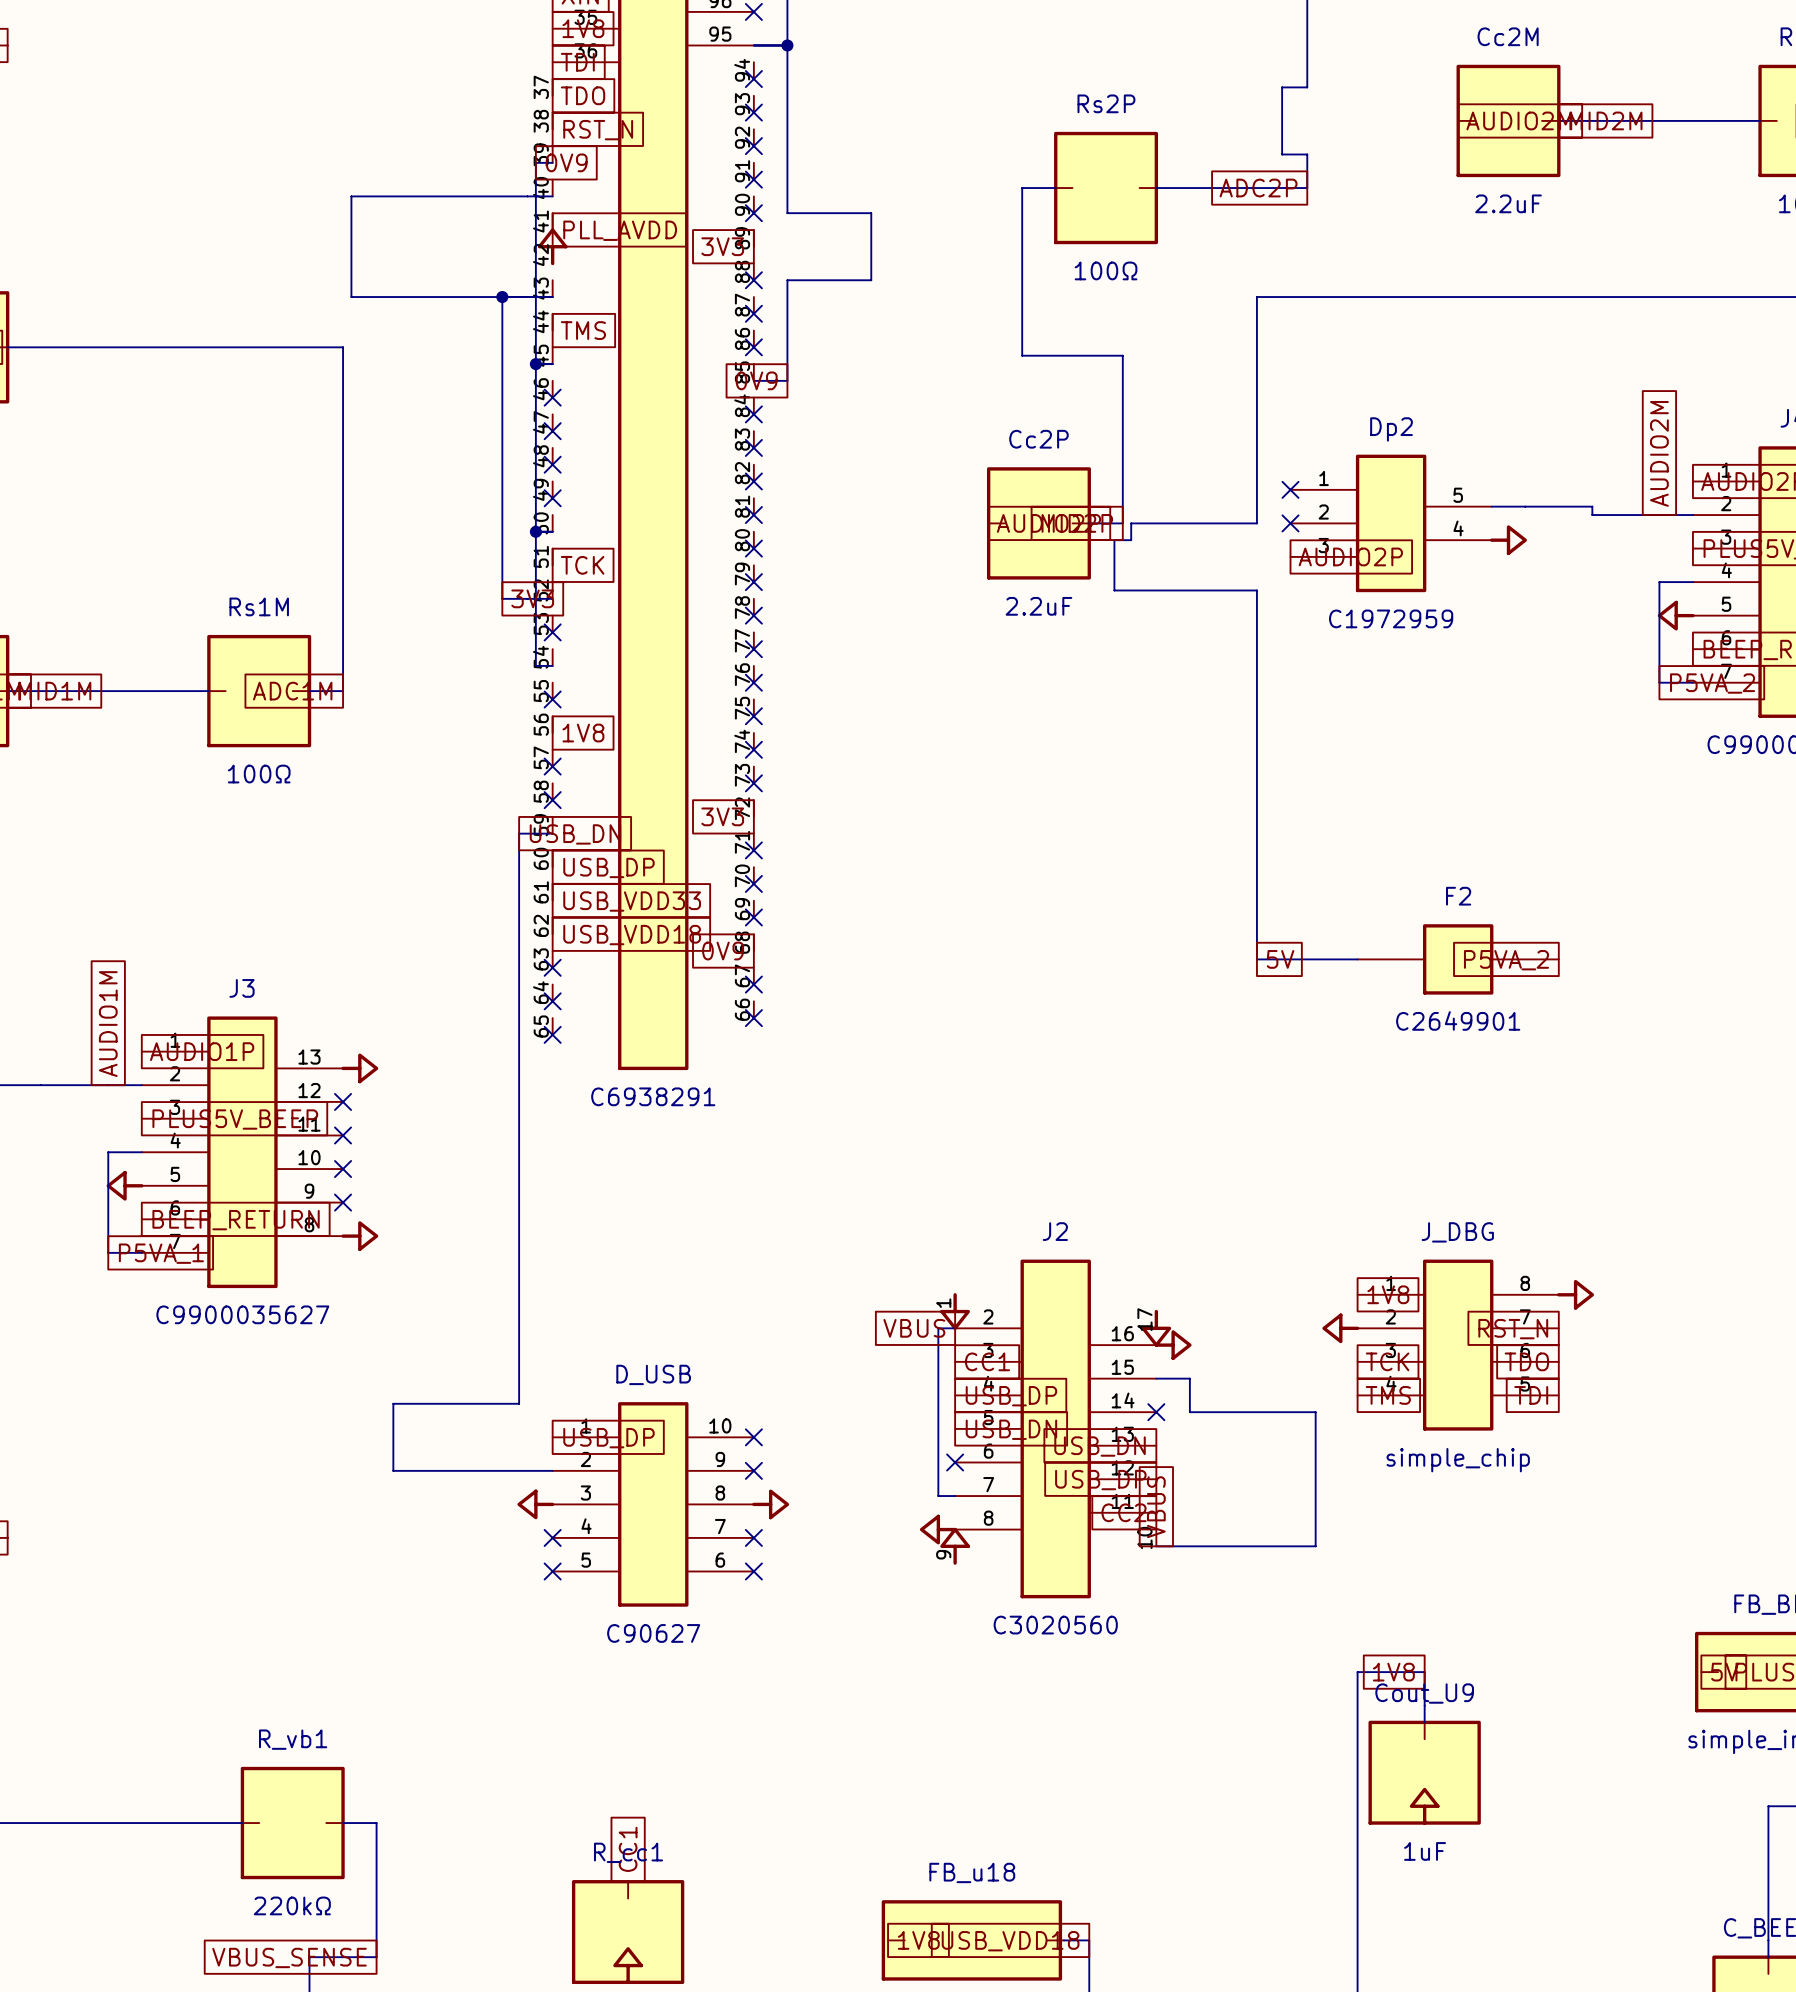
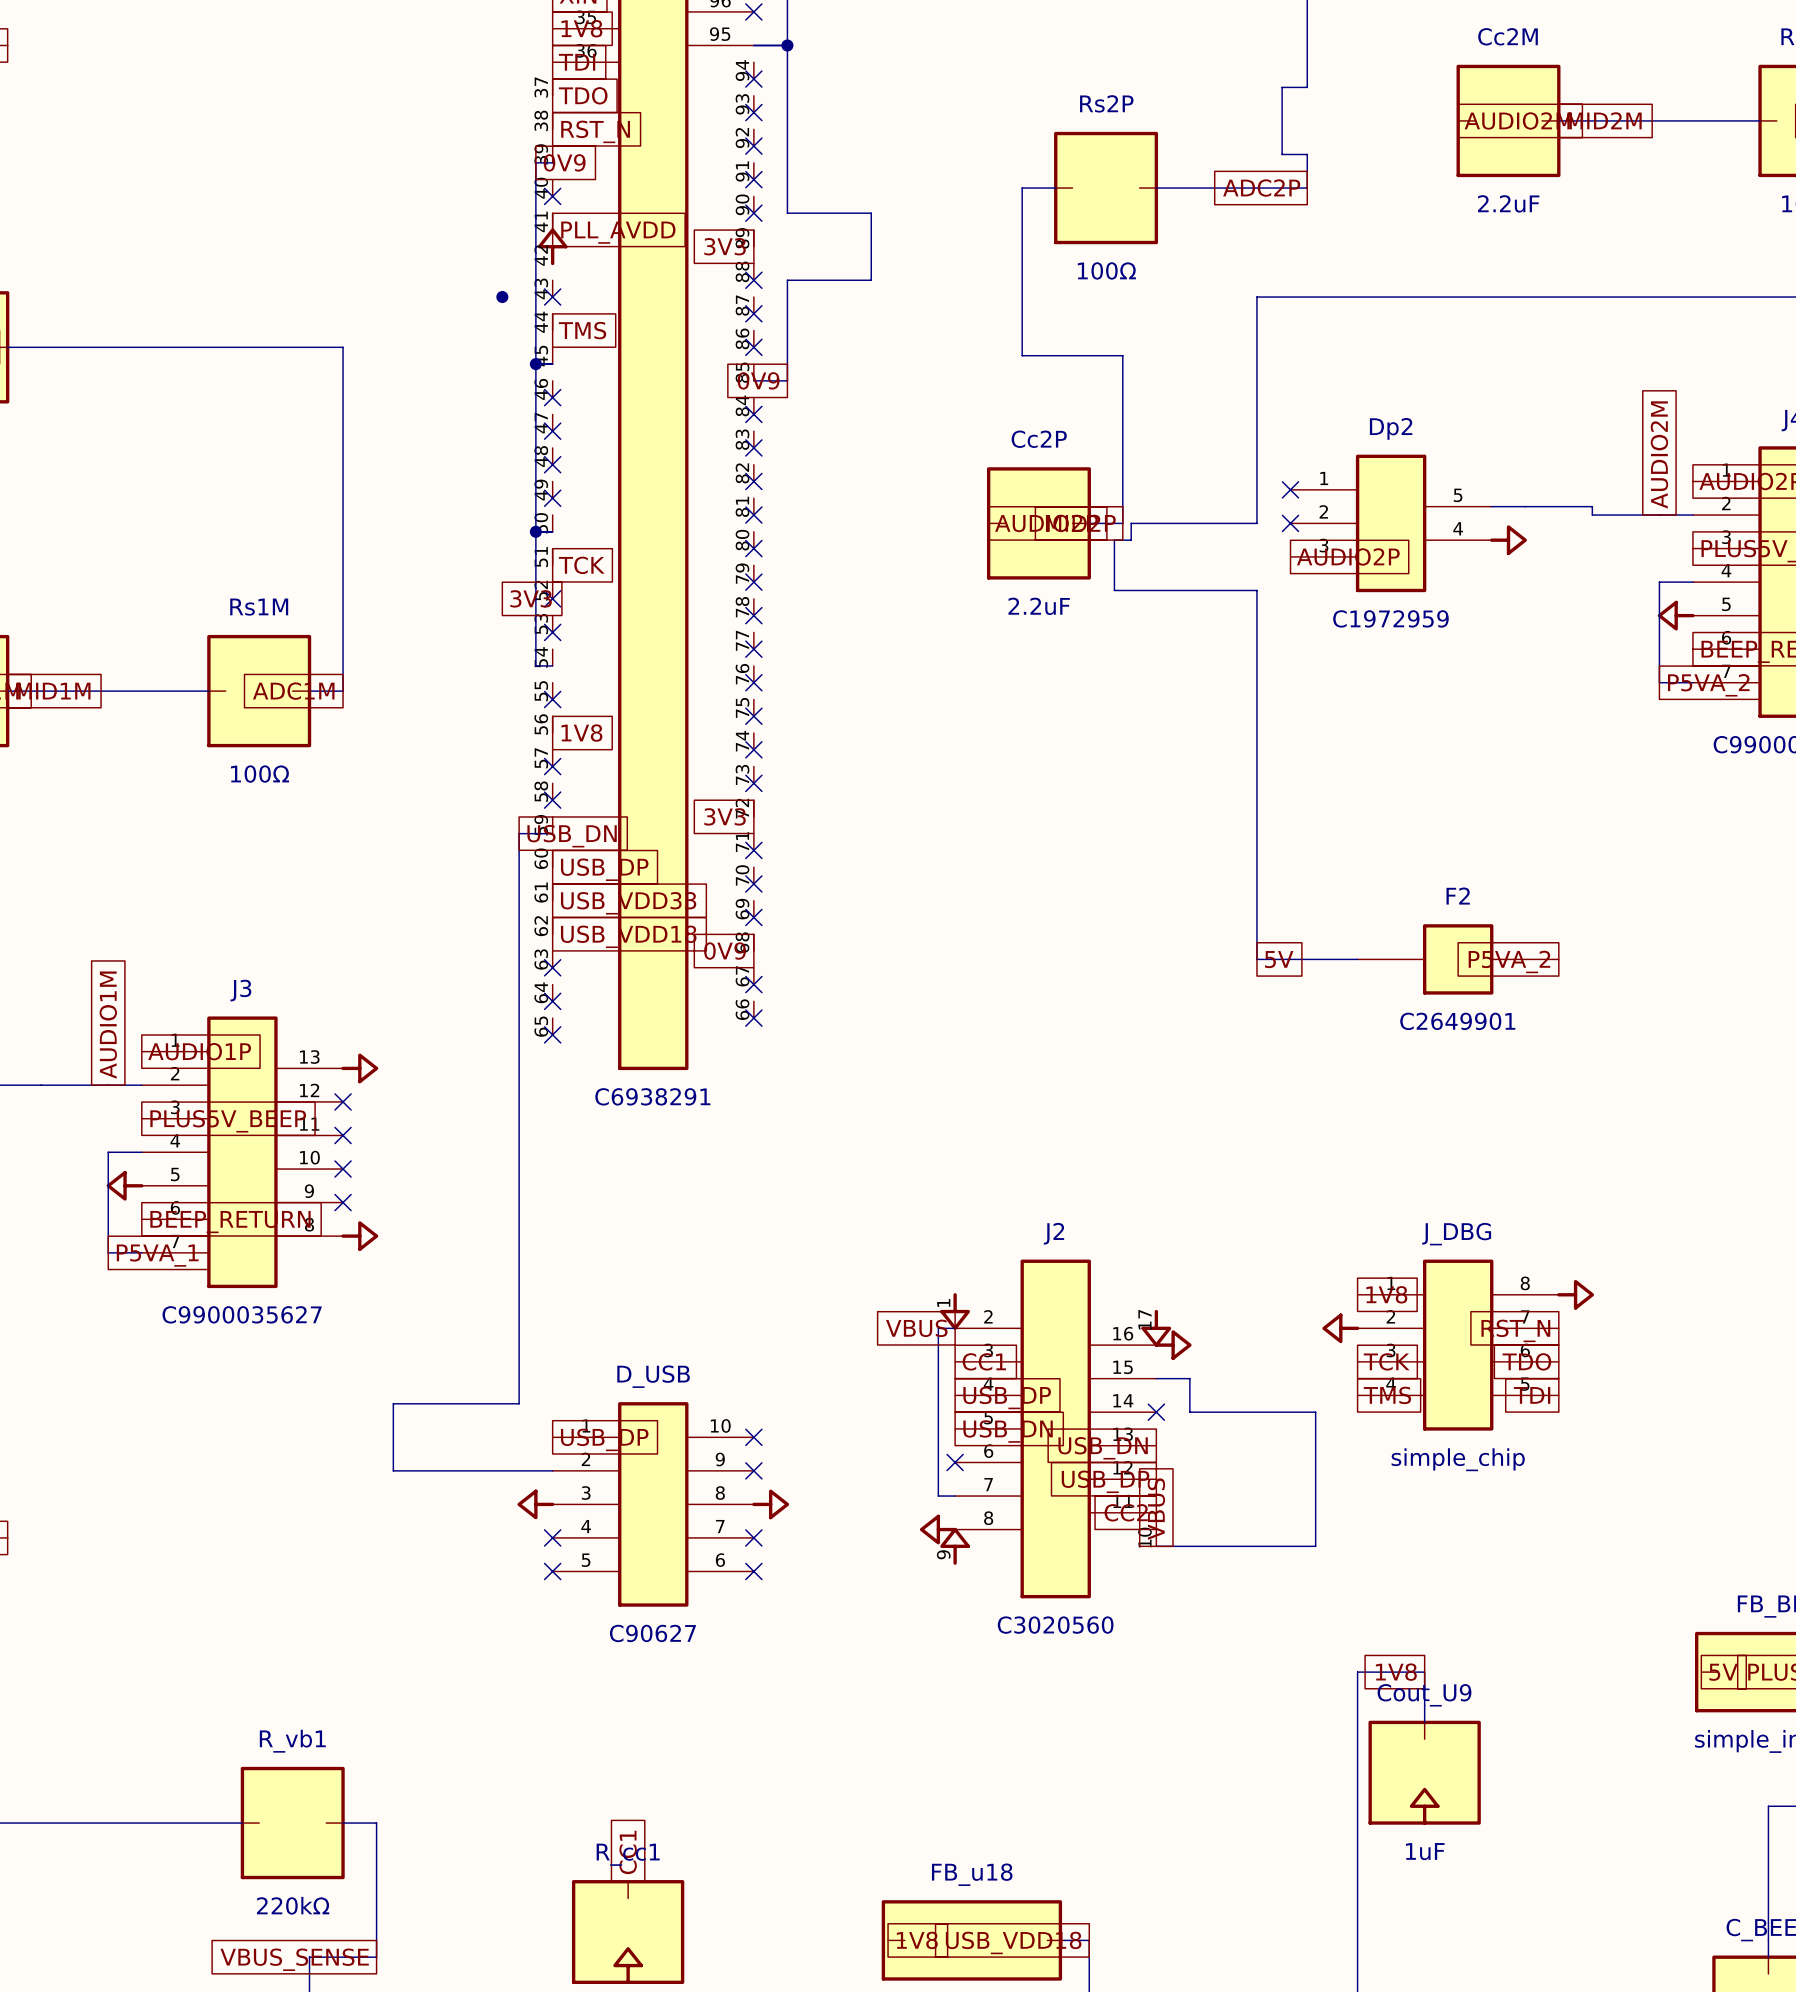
wire: (552, 196) (351, 196) (351, 297) (552, 297) -> none
no-connect mark: none -> (552, 196)
wire: (502, 297) (502, 598) (552, 598) -> none
no-connect mark: none -> (552, 297)
no-connect mark: none -> (552, 598)

